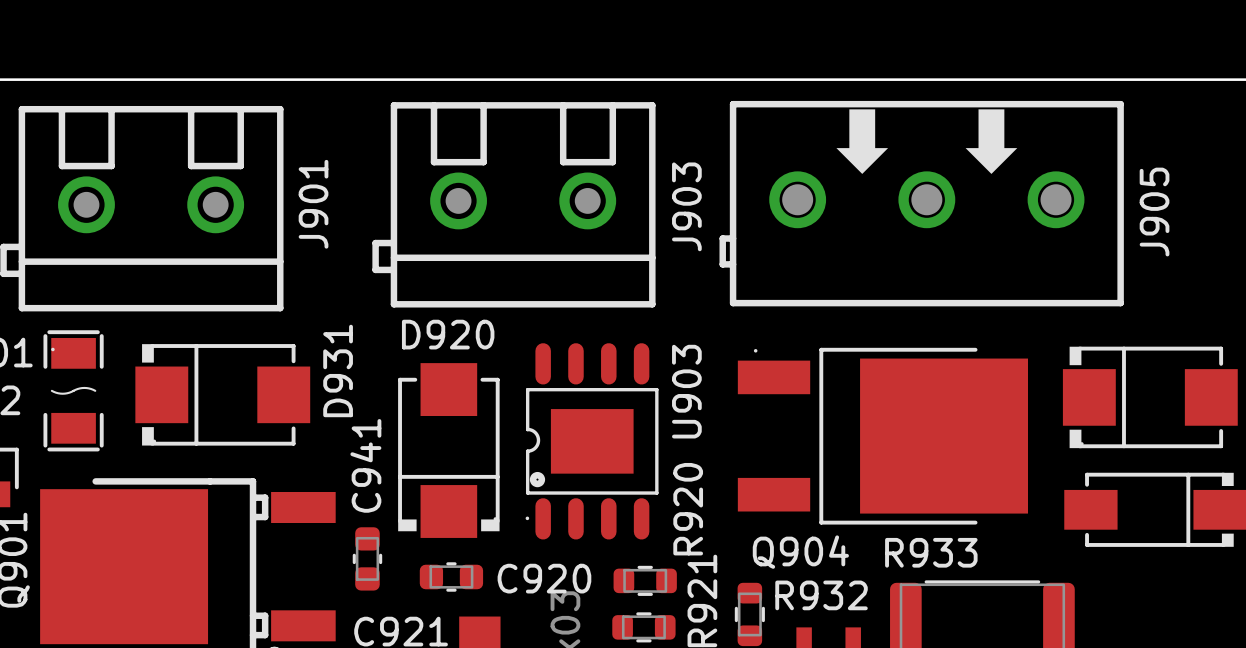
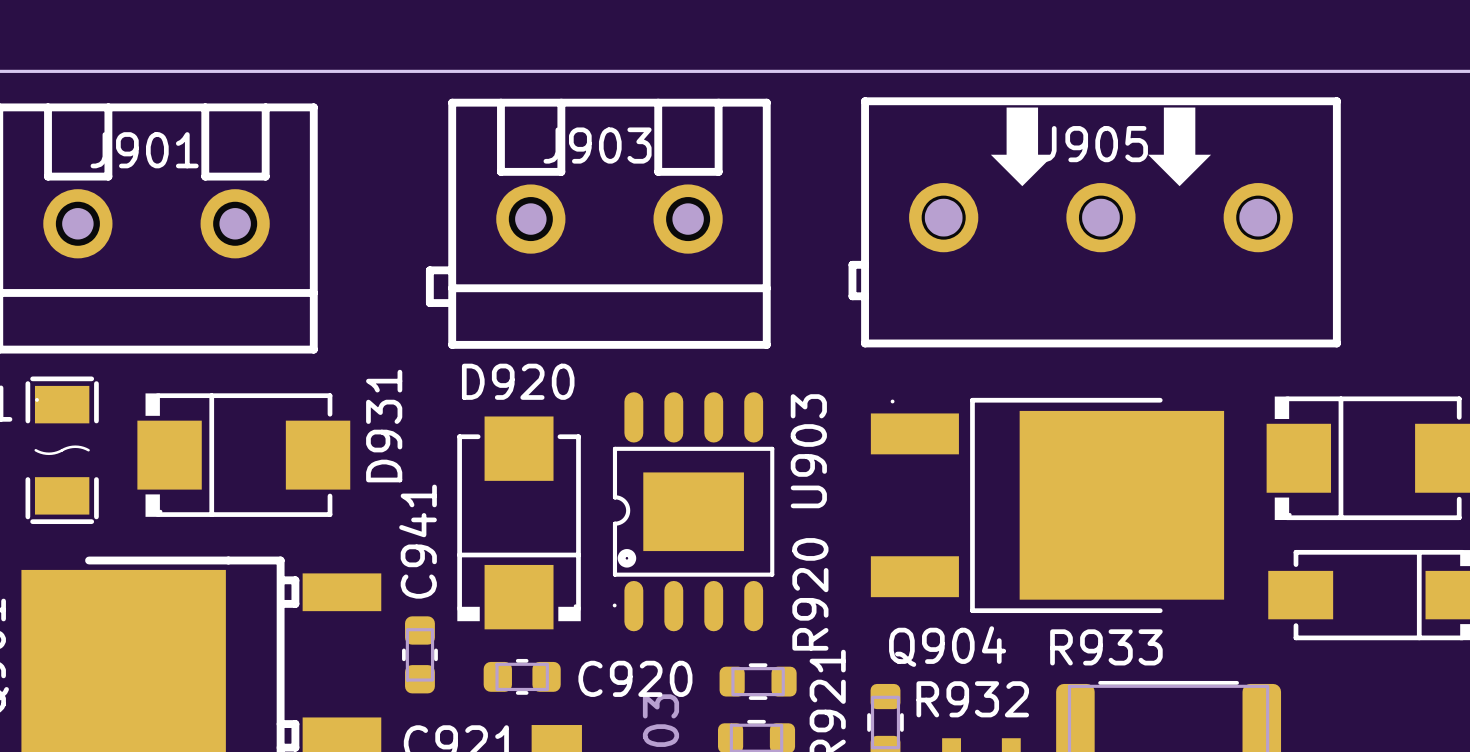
J901 name rotation: 0° (313, 204) -> 90° clockwise (144, 150)
J901 name position: J901 (313, 204) -> J901 (144, 150)
J903 name rotation: 0° (686, 206) -> 90° clockwise (597, 145)
J903 name position: J903 (686, 206) -> J903 (597, 145)
J905 name rotation: 0° (1154, 212) -> 90° clockwise (1093, 144)
J905 name position: J905 (1154, 212) -> J905 (1093, 144)

